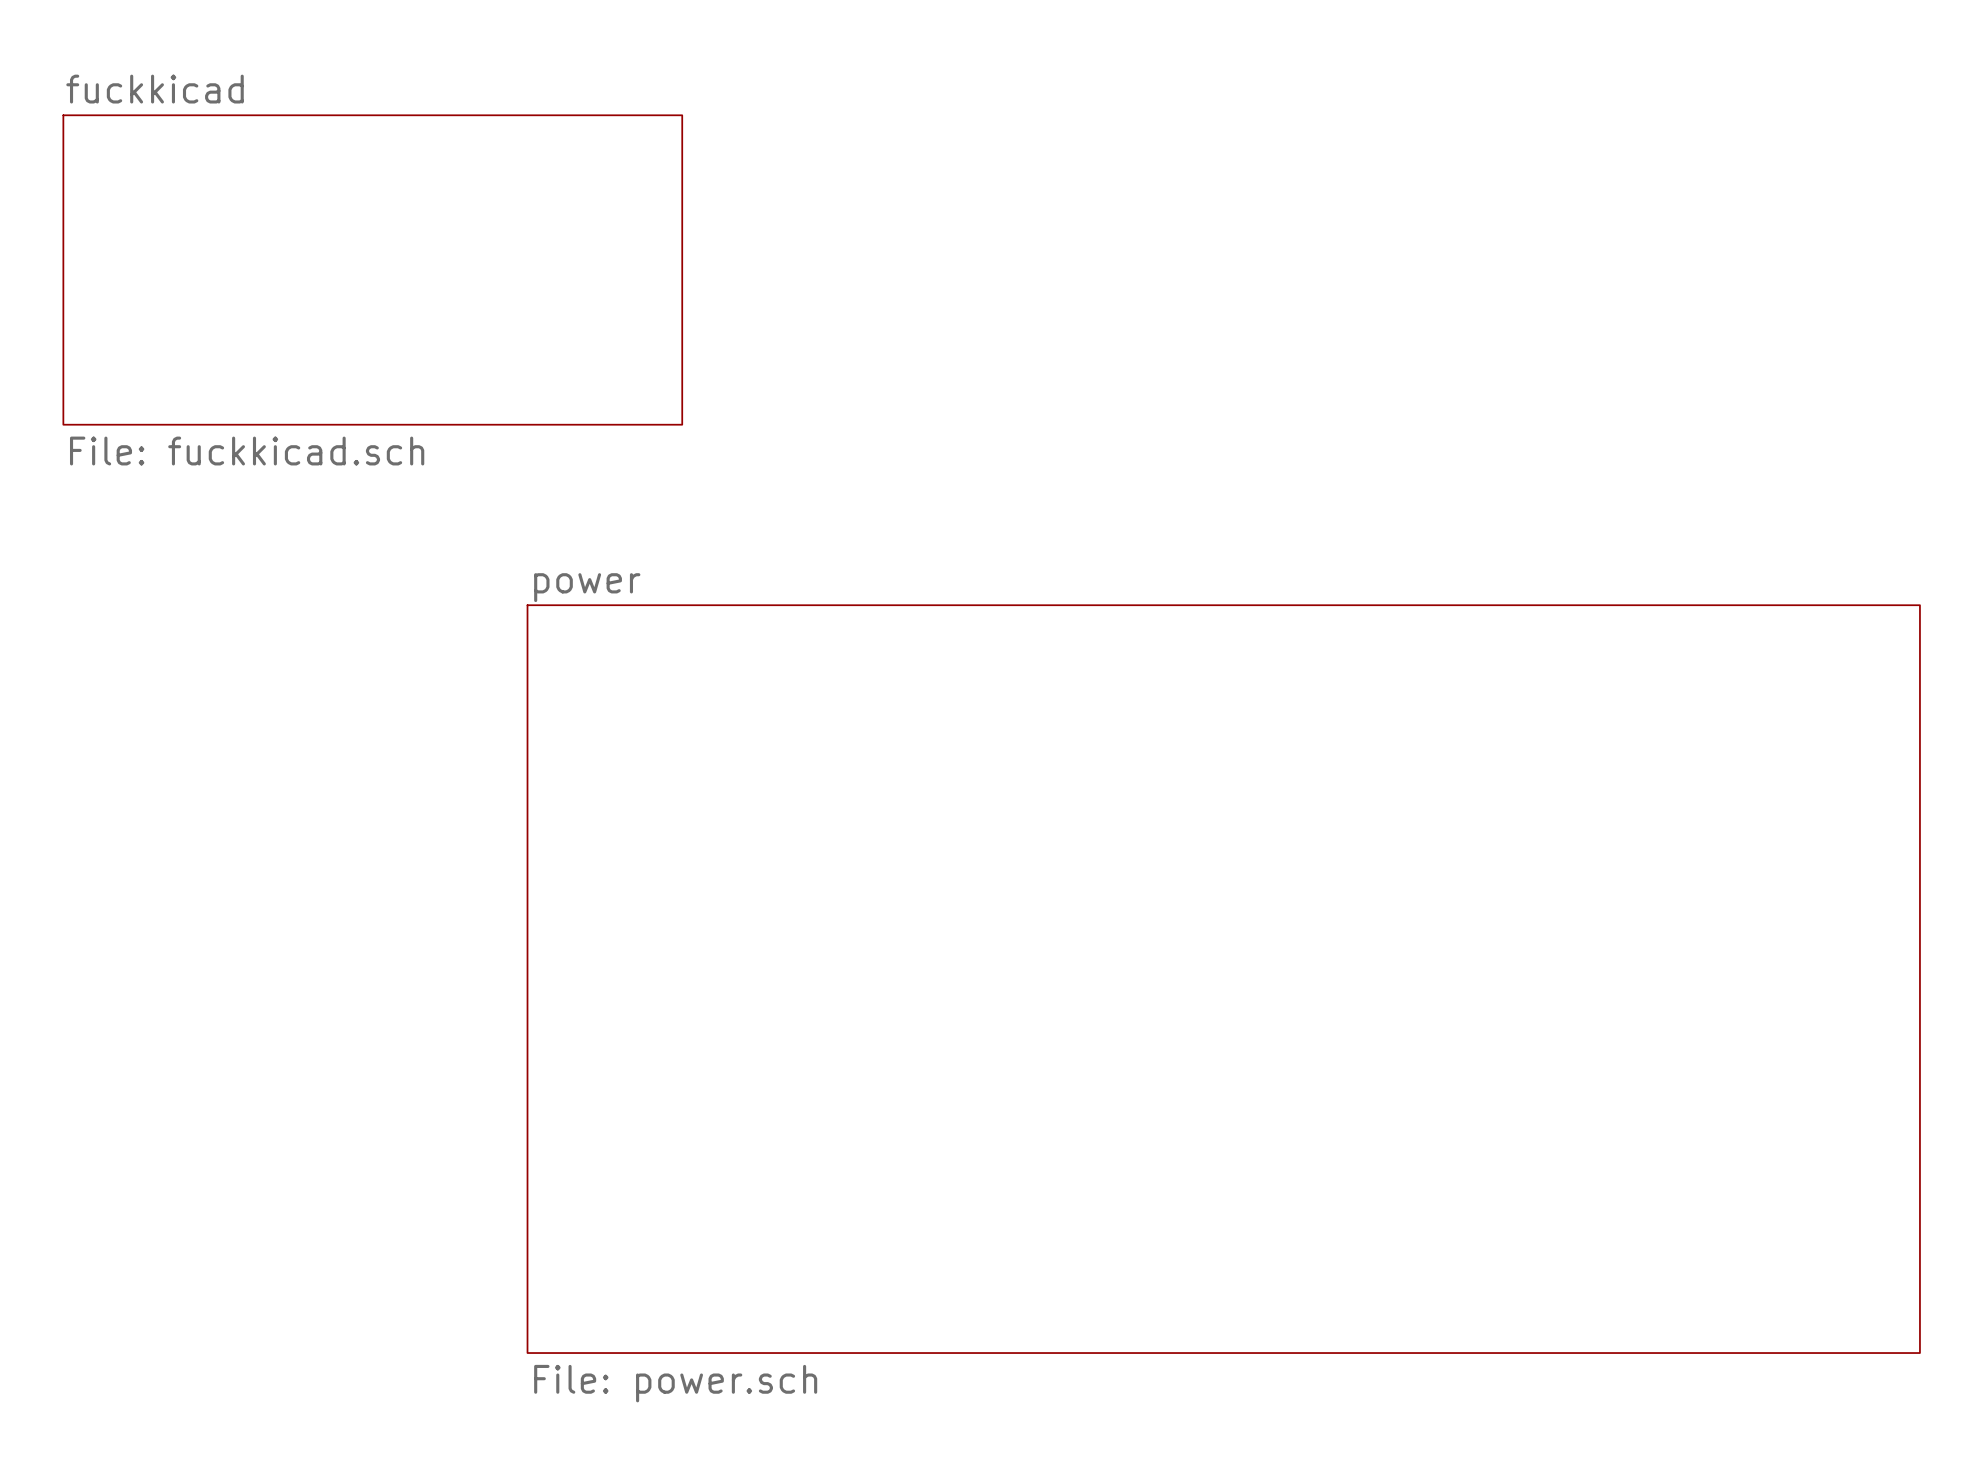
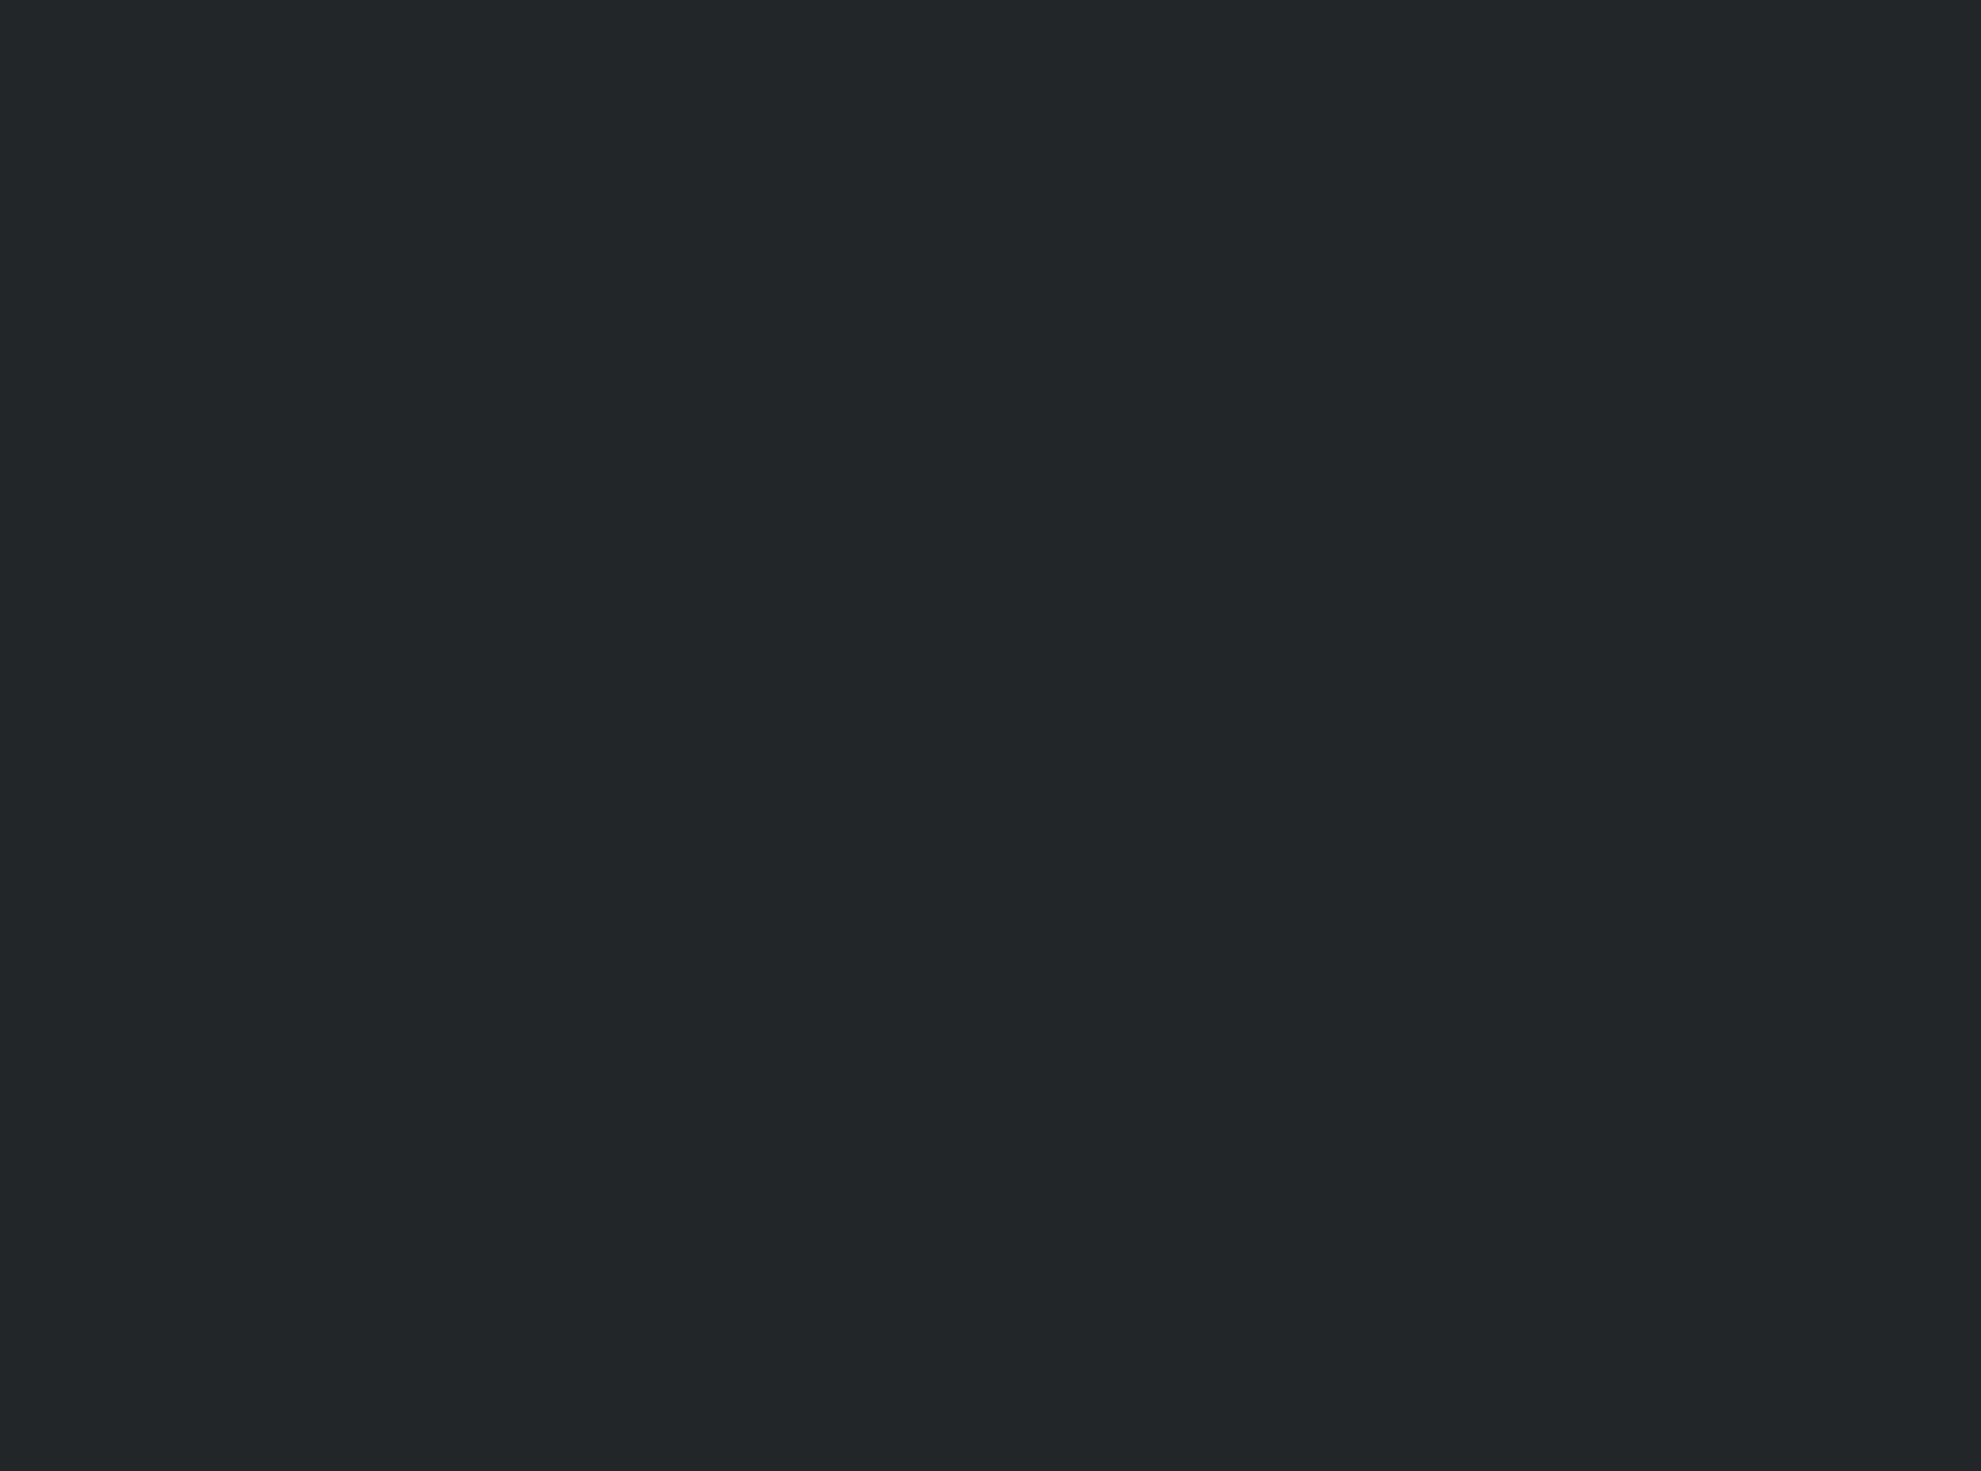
sheet fuckkicad: File: fuckkicad.sch (372, 270) -> none
sheet power: File: power.sch (1223, 979) -> none

